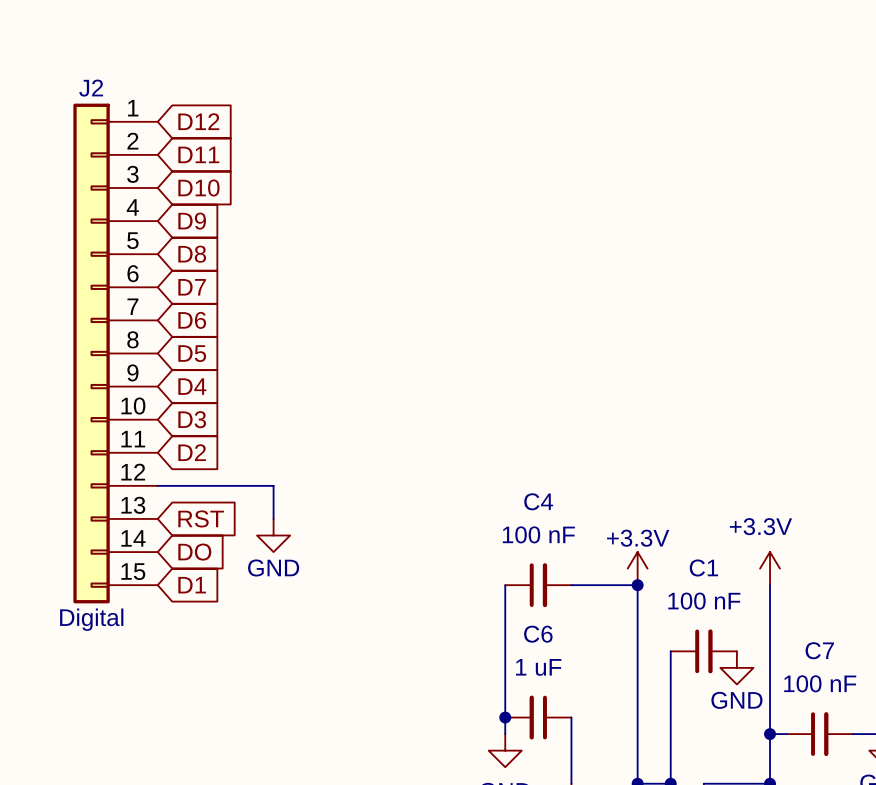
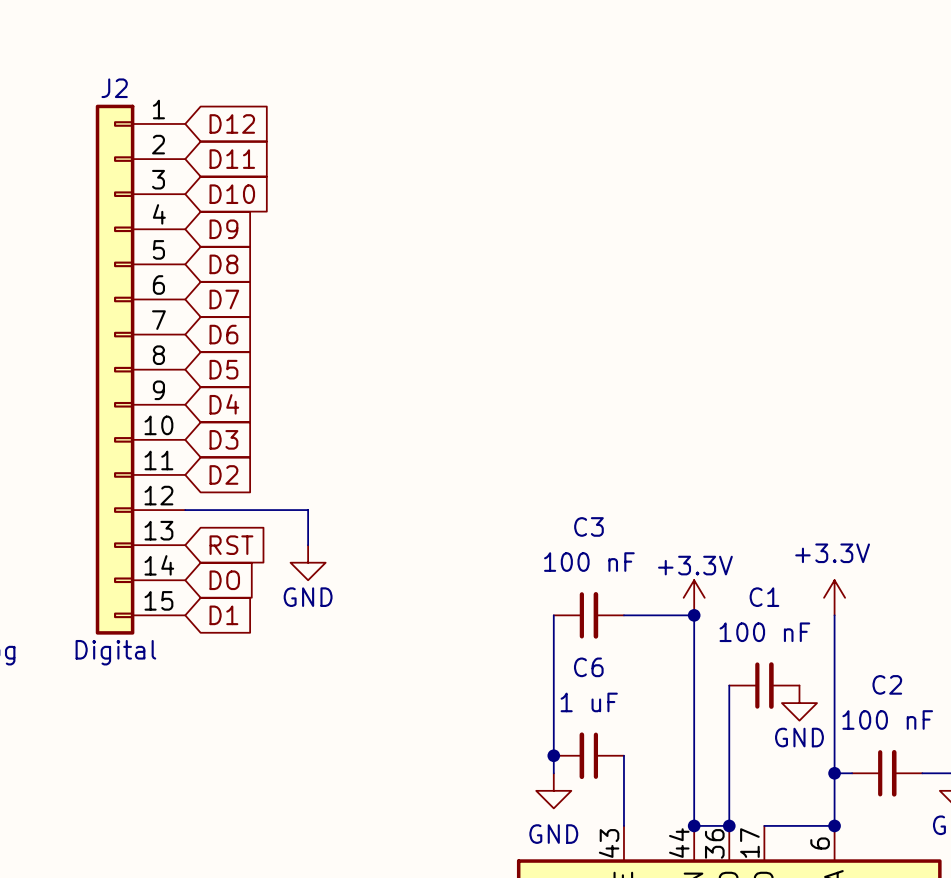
C4 name: C4 (538, 501) -> C3 (588, 526)
C7 name: C7 (819, 650) -> C2 (887, 684)

